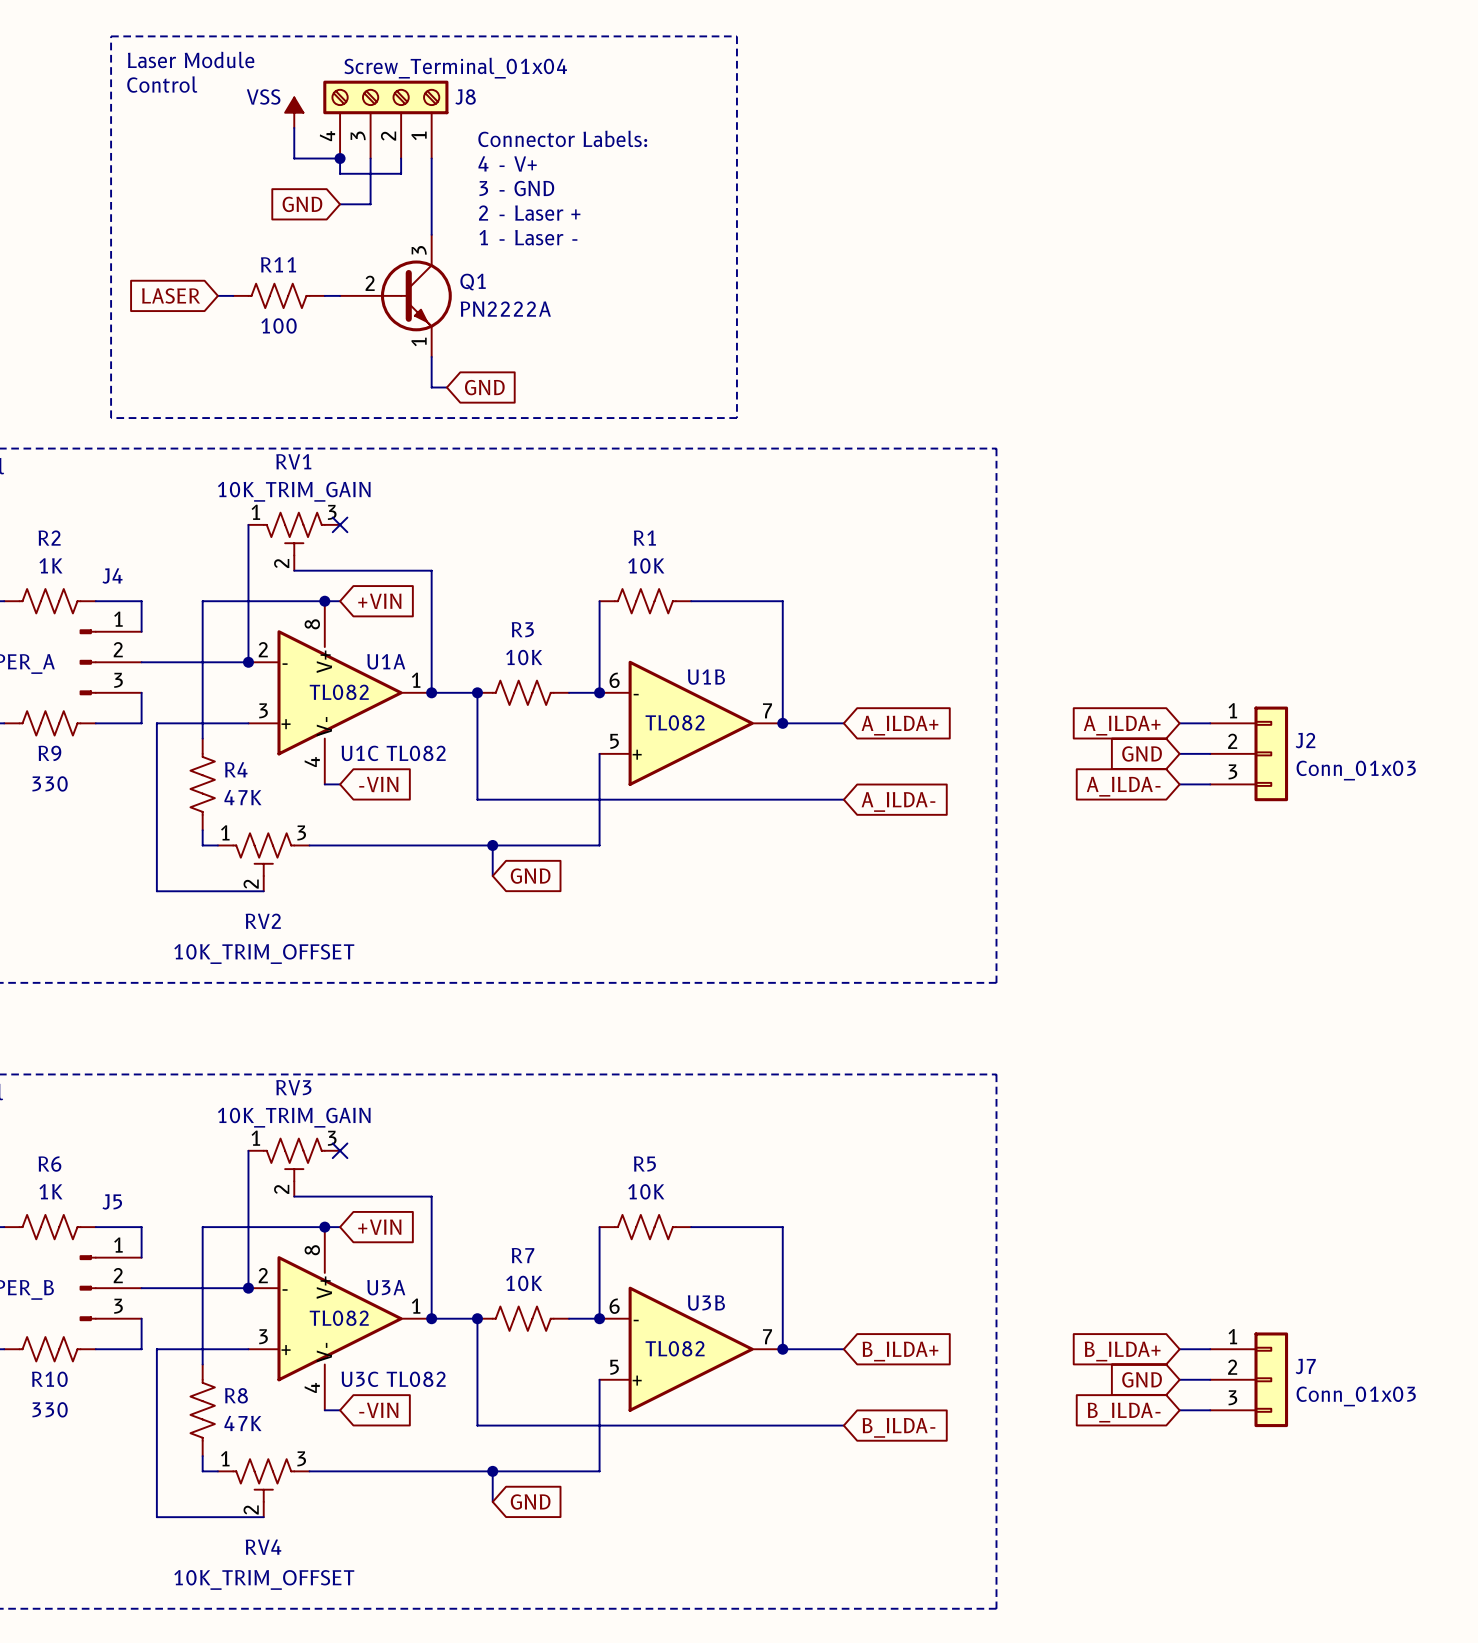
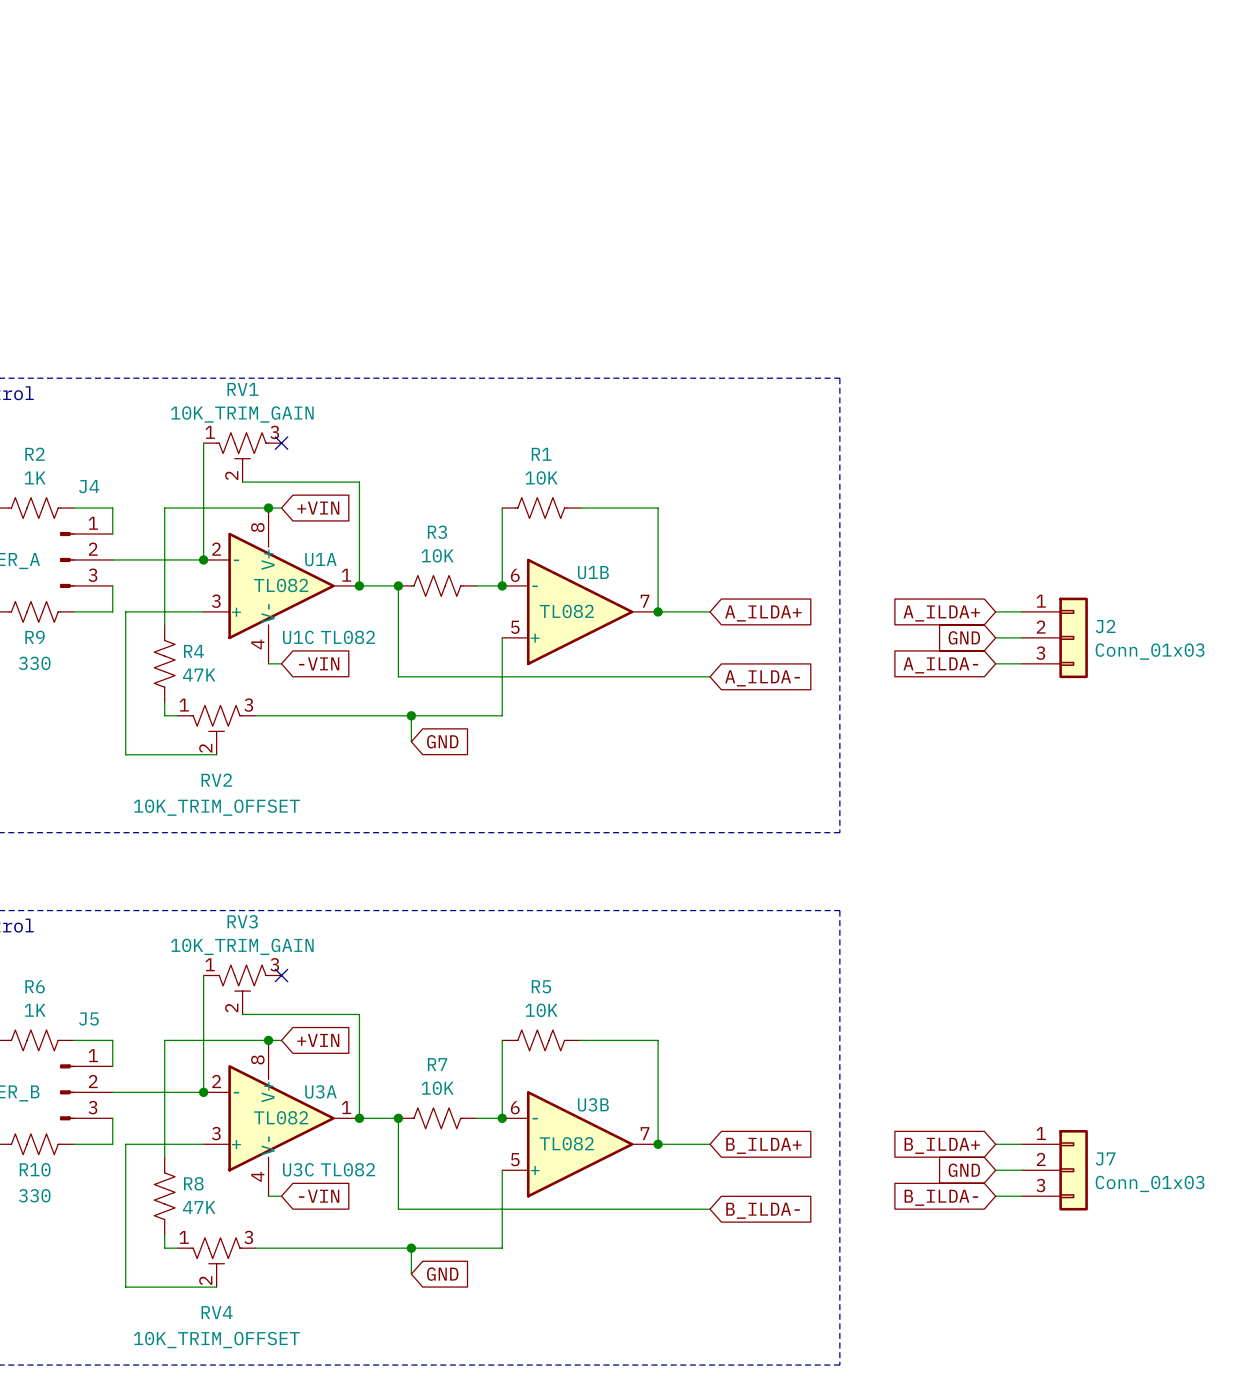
line: (111, 36) (736, 36) (736, 418) (111, 418) (111, 36) -> none
text: Laser Module (191, 59) -> none
text: Control (162, 84) -> none
power symbol: VSS (294, 112) -> none
J8: Screw_Terminal_01x04 (385, 119) -> none
wire: (294, 127) (294, 158) (340, 158) (340, 173) (401, 173) (401, 158) -> none
text: Connector Labels: (562, 138) -> none
junction: (340, 158) -> none
wire: (370, 158) (370, 204) (340, 204) -> none
wire: (431, 158) (431, 234) -> none
text: 4 - V+ (507, 163) -> none
text: 3 - GND (516, 188) -> none
global label: GND (302, 204) -> none
text: 2 - Laser + (529, 213) -> none
text: 1 - Laser - (528, 237) -> none
global label: LASER (171, 295) -> none
wire: (217, 295) (233, 295) -> none
R11: 100 (279, 295) -> none
wire: (324, 295) (340, 295) -> none
Q1: PN2222A (395, 295) -> none
wire: (431, 356) (431, 387) (446, 387) -> none
global label: GND (484, 387) -> none

